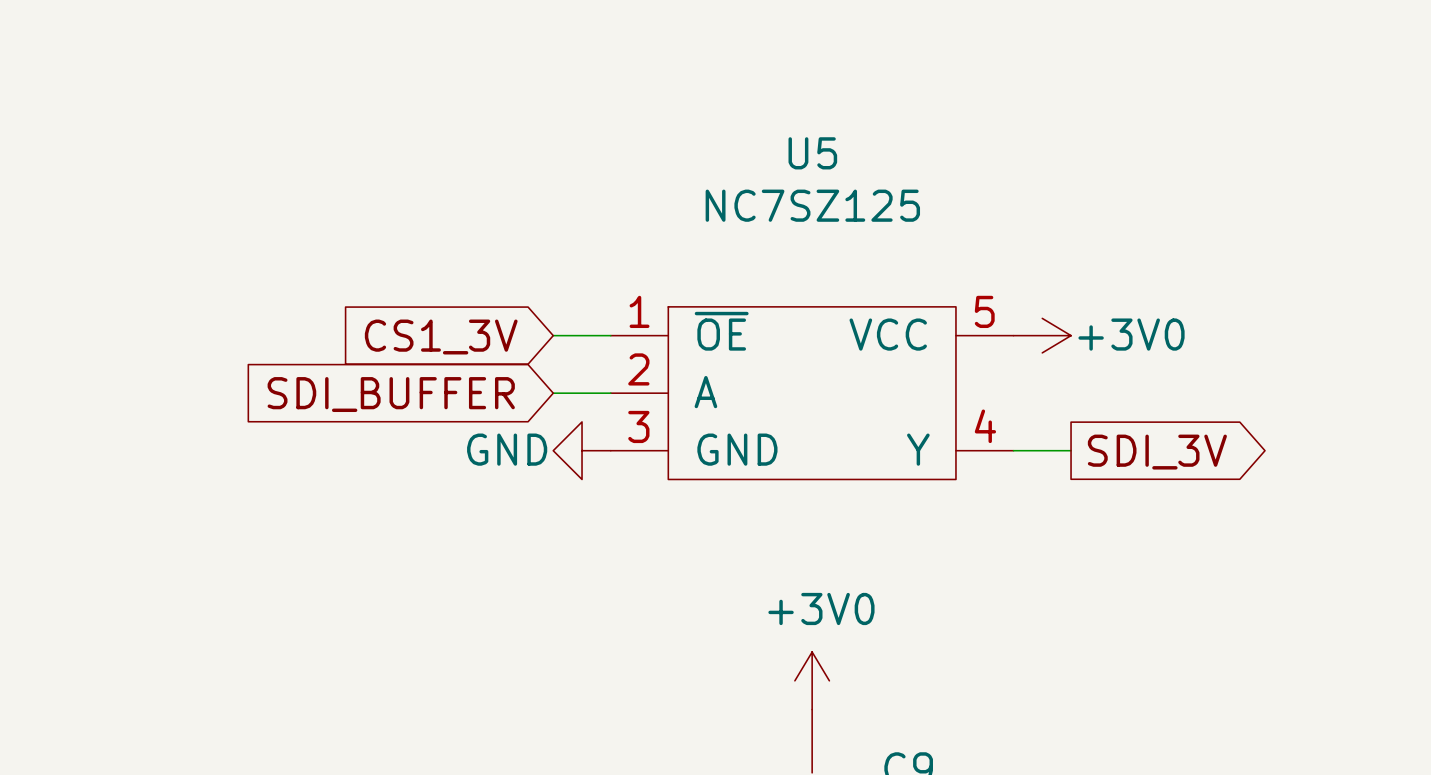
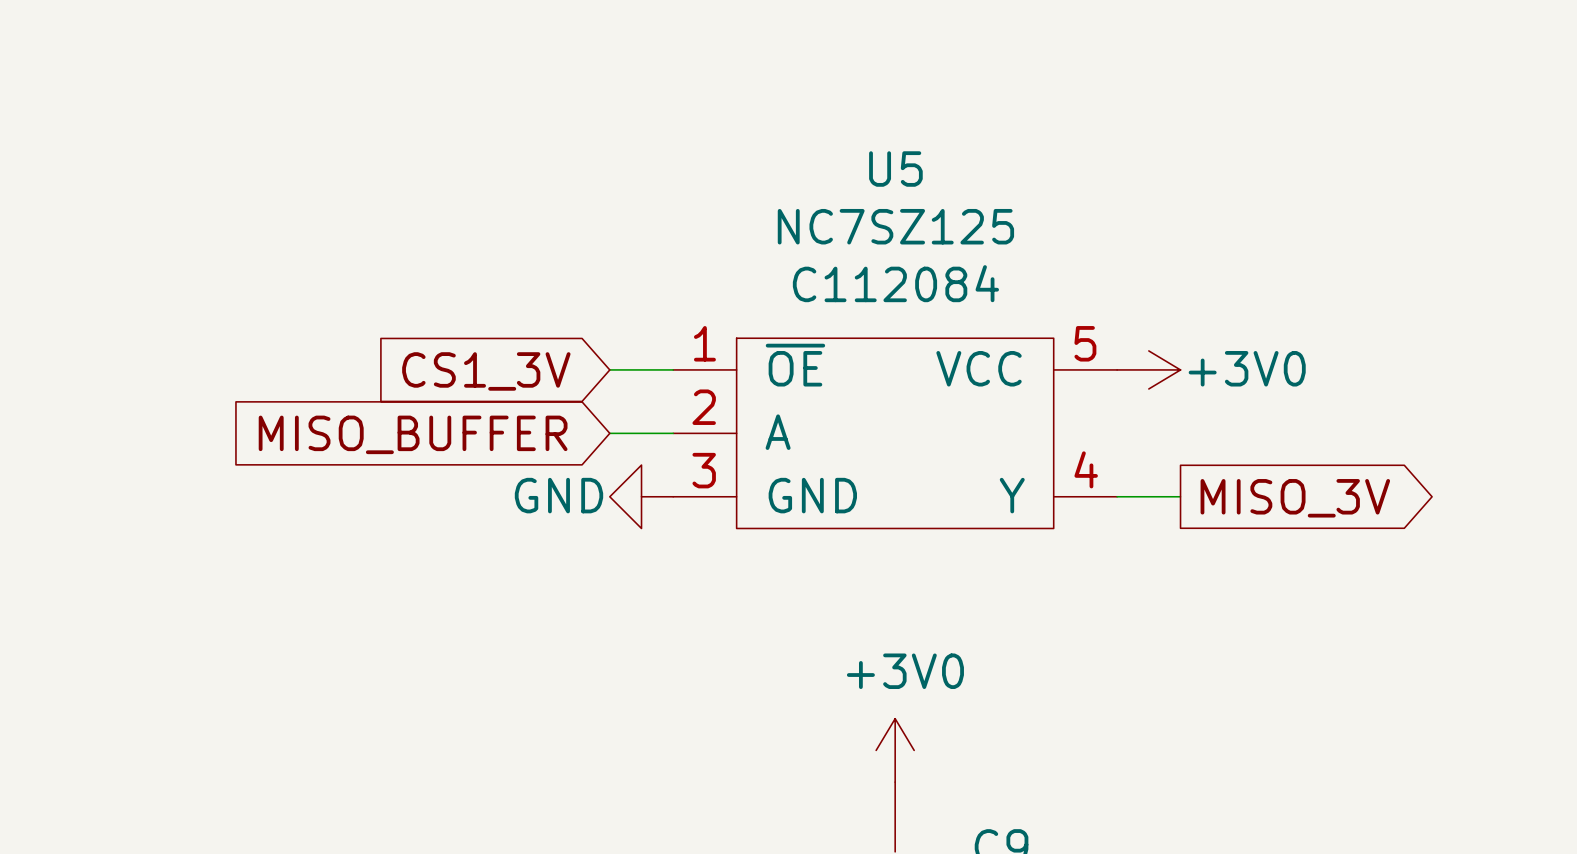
U5 text: none -> C112084 (895, 283)
global label: SDI_BUFFER (391, 394) -> MISO_BUFFER (413, 434)
global label: SDI_3V (1157, 452) -> MISO_3V (1295, 498)

